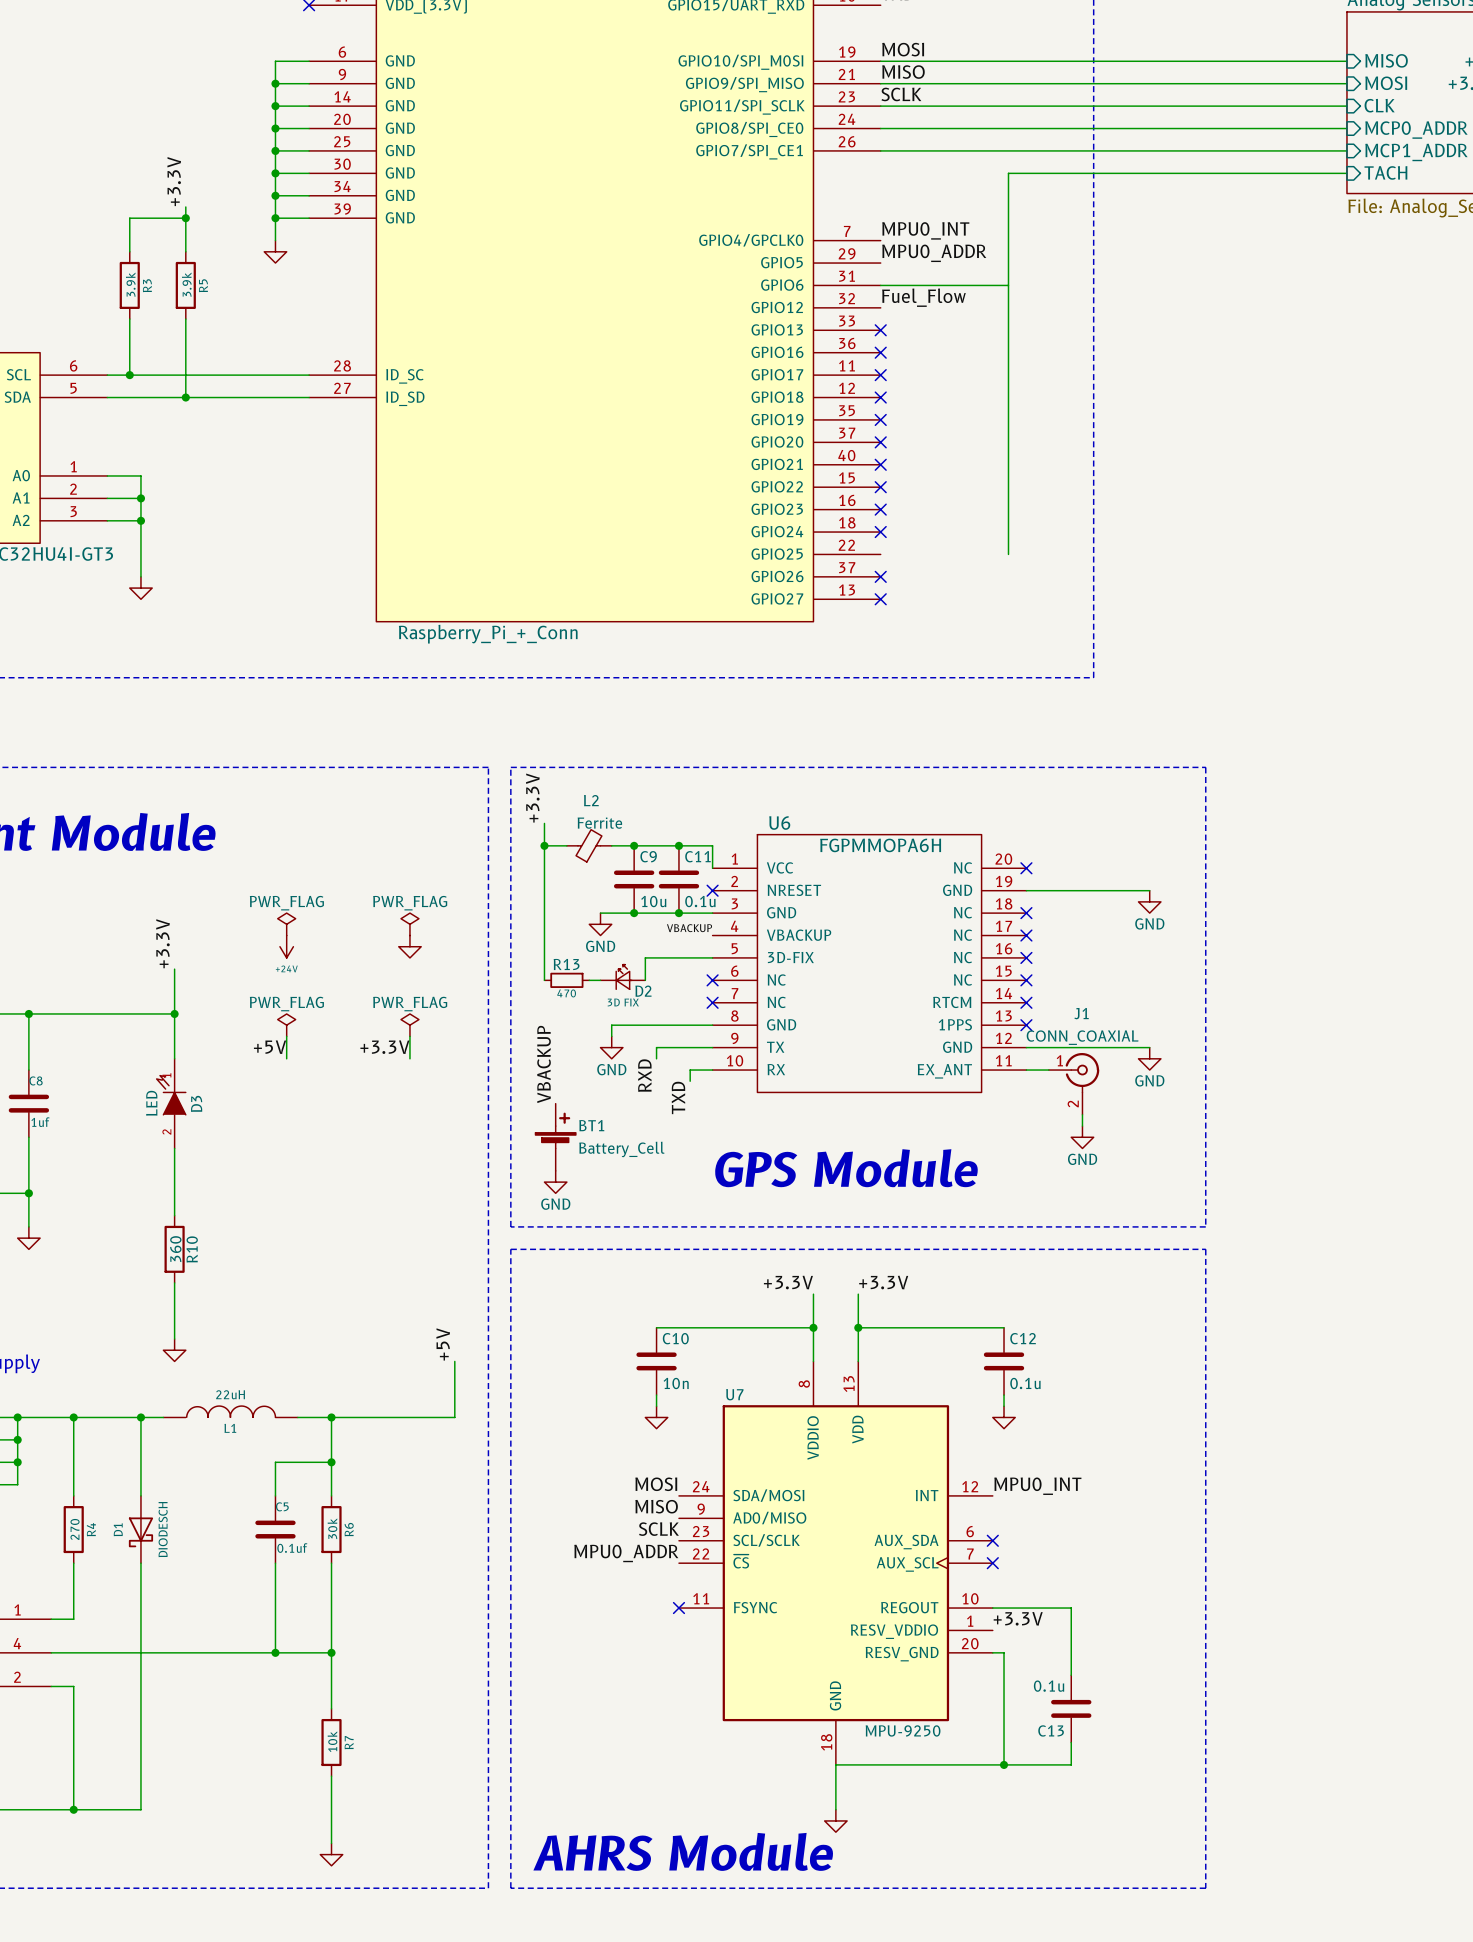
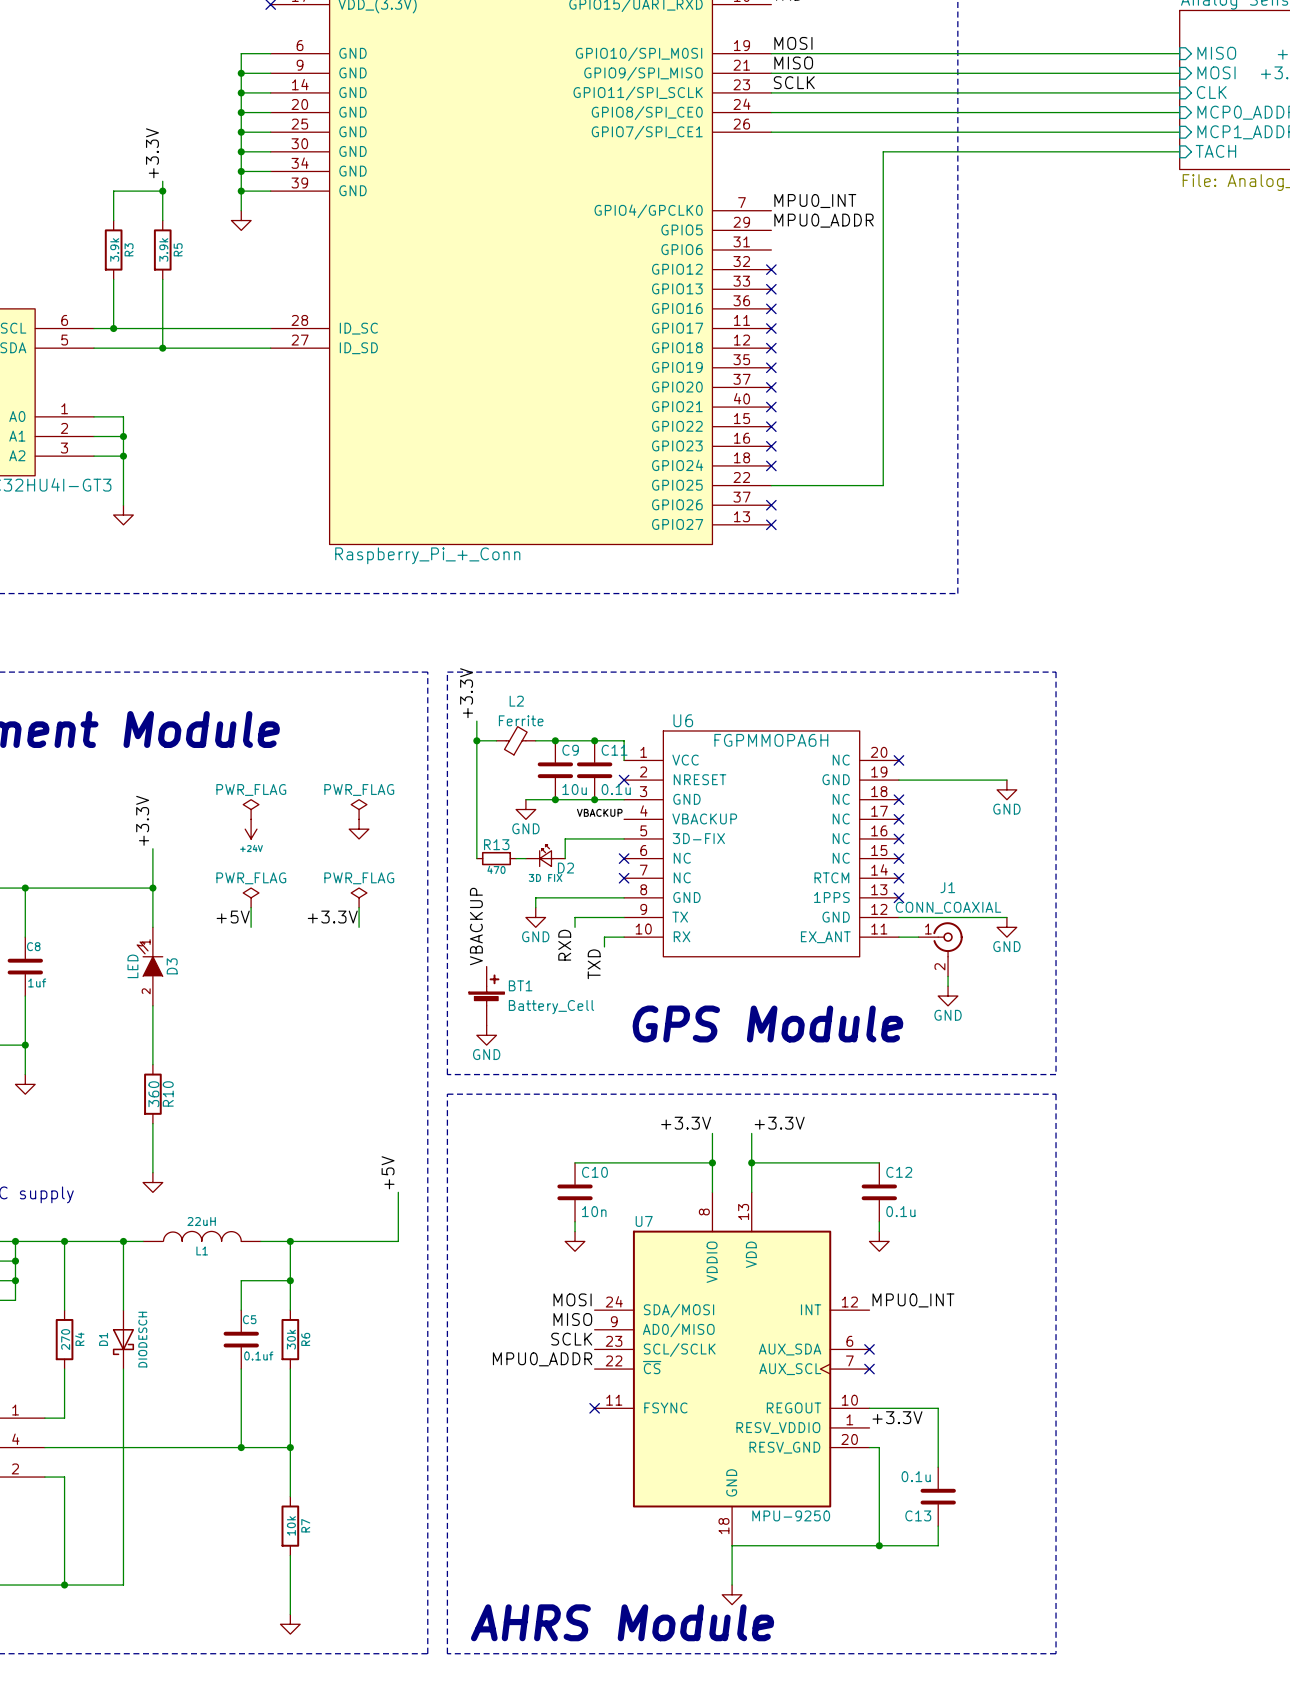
wire: (880, 285) (1008, 285) -> none
label: Fuel_Flow (923, 297) -> none
no-connect mark: none -> (771, 269)
wire: none -> (771, 485) (883, 485)

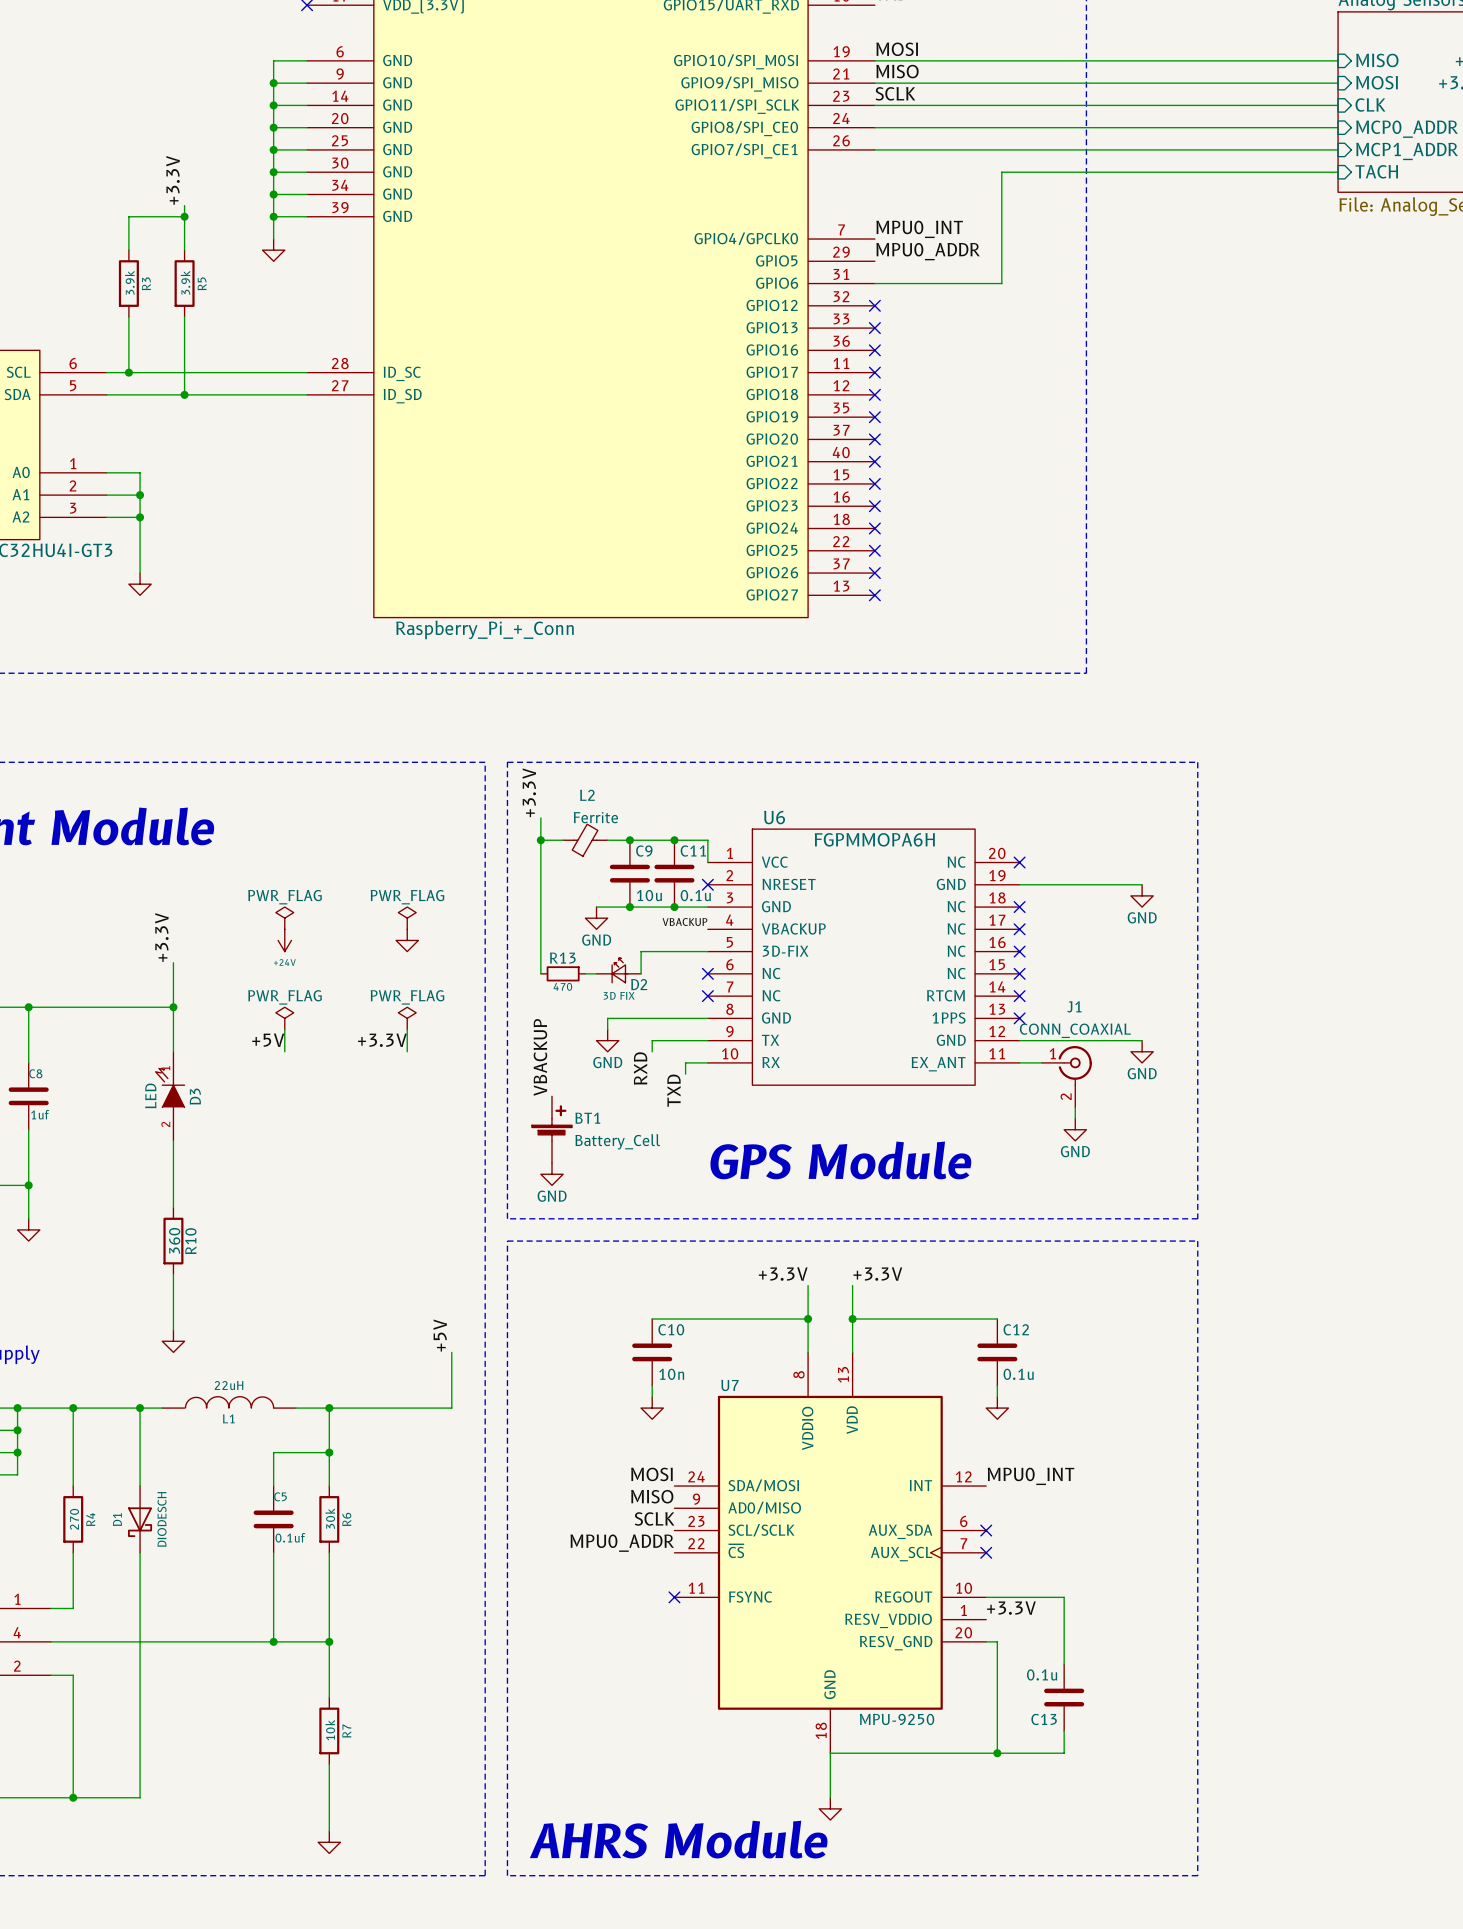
wire: (883, 249) (883, 485) (771, 485) -> (1001, 283) (874, 283)
no-connect mark: none -> (874, 550)

